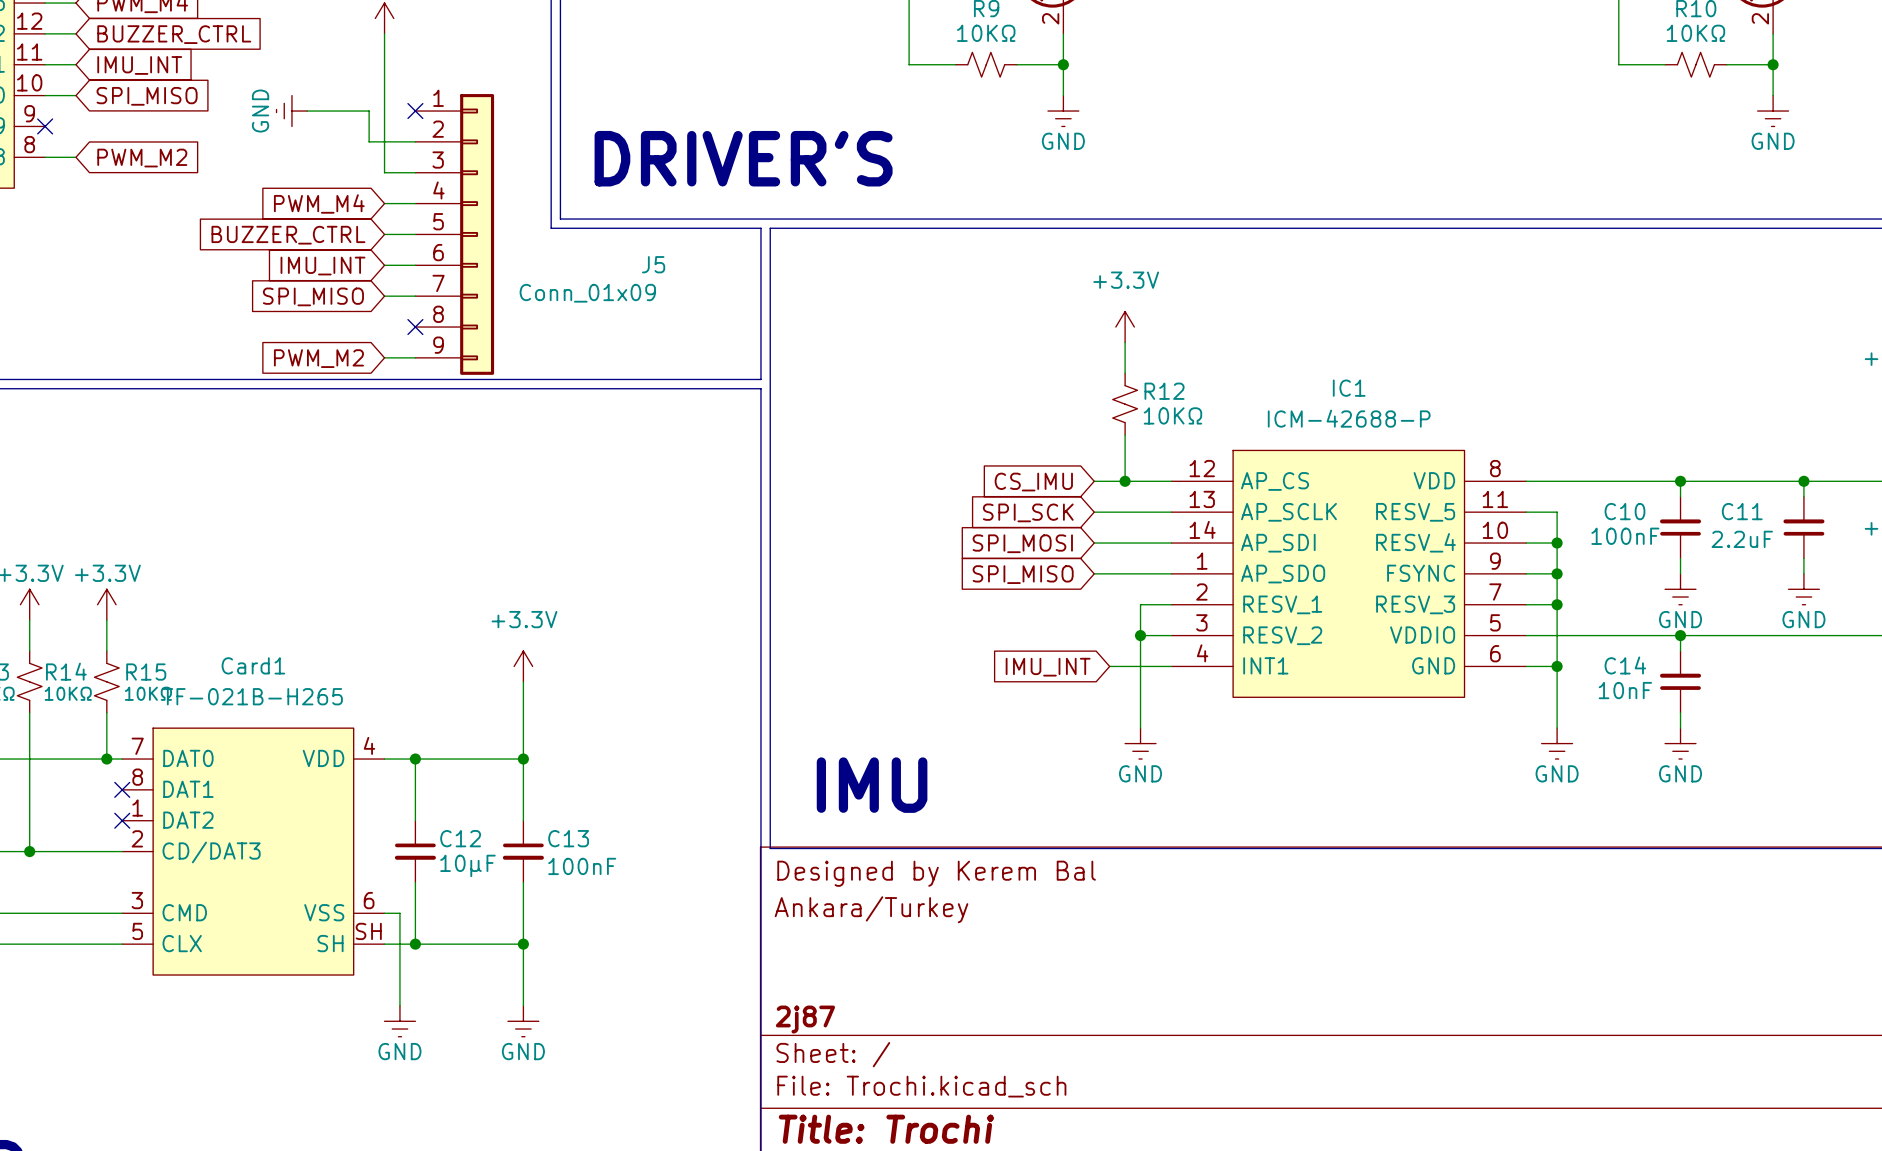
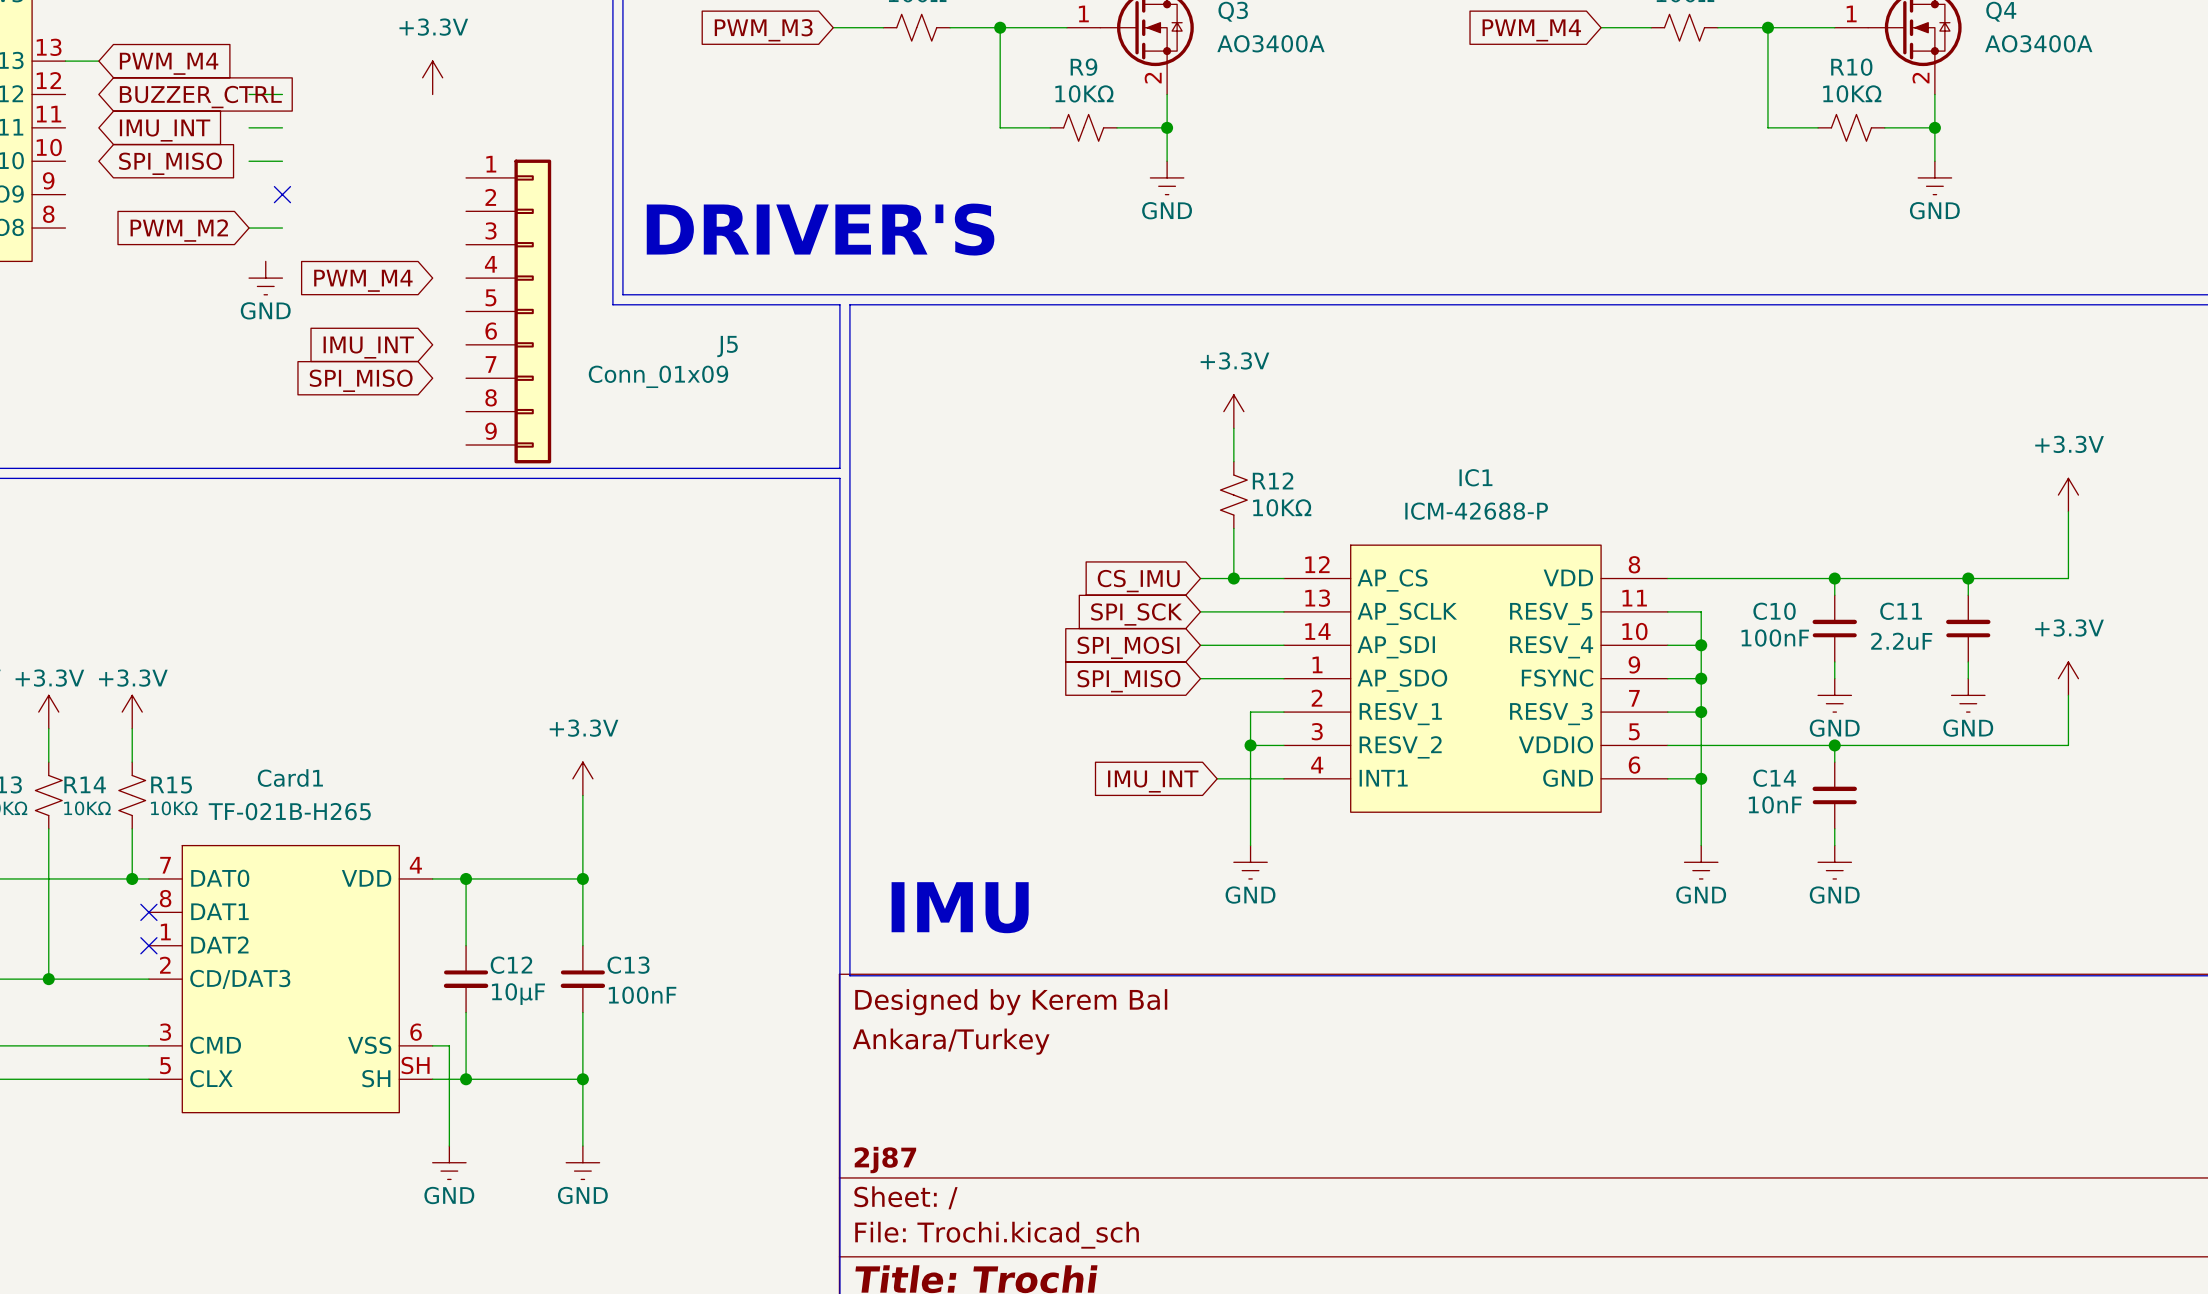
wire: (45, 33) (75, 33) -> (249, 94) (282, 94)
wire: (384, 33) (384, 172) (415, 172) -> none
wire: (45, 64) (75, 64) -> (249, 127) (282, 127)
wire: (45, 95) (75, 95) -> (249, 161) (282, 161)
power symbol rotation: 0° (291, 111) -> 90° counterclockwise (265, 278)
power symbol position: GND (291, 111) -> GND (265, 278)
wire: (307, 111) (369, 111) (369, 141) (415, 141) -> none
no-connect mark: (415, 111) -> none
no-connect mark: (45, 126) -> none
no-connect mark: none -> (282, 194)
wire: (45, 157) (75, 157) -> (249, 228) (282, 228)
global label rotation: 0° (142, 158) -> 180° (179, 230)
wire: (384, 203) (415, 203) -> none
wire: (384, 234) (415, 234) -> none
global label: BUZZER_CTRL (288, 235) -> none
wire: (384, 265) (415, 265) -> none
wire: (384, 296) (415, 296) -> none
no-connect mark: (415, 327) -> none
wire: (384, 357) (415, 357) -> none
global label: PWM_M2 (318, 358) -> none

